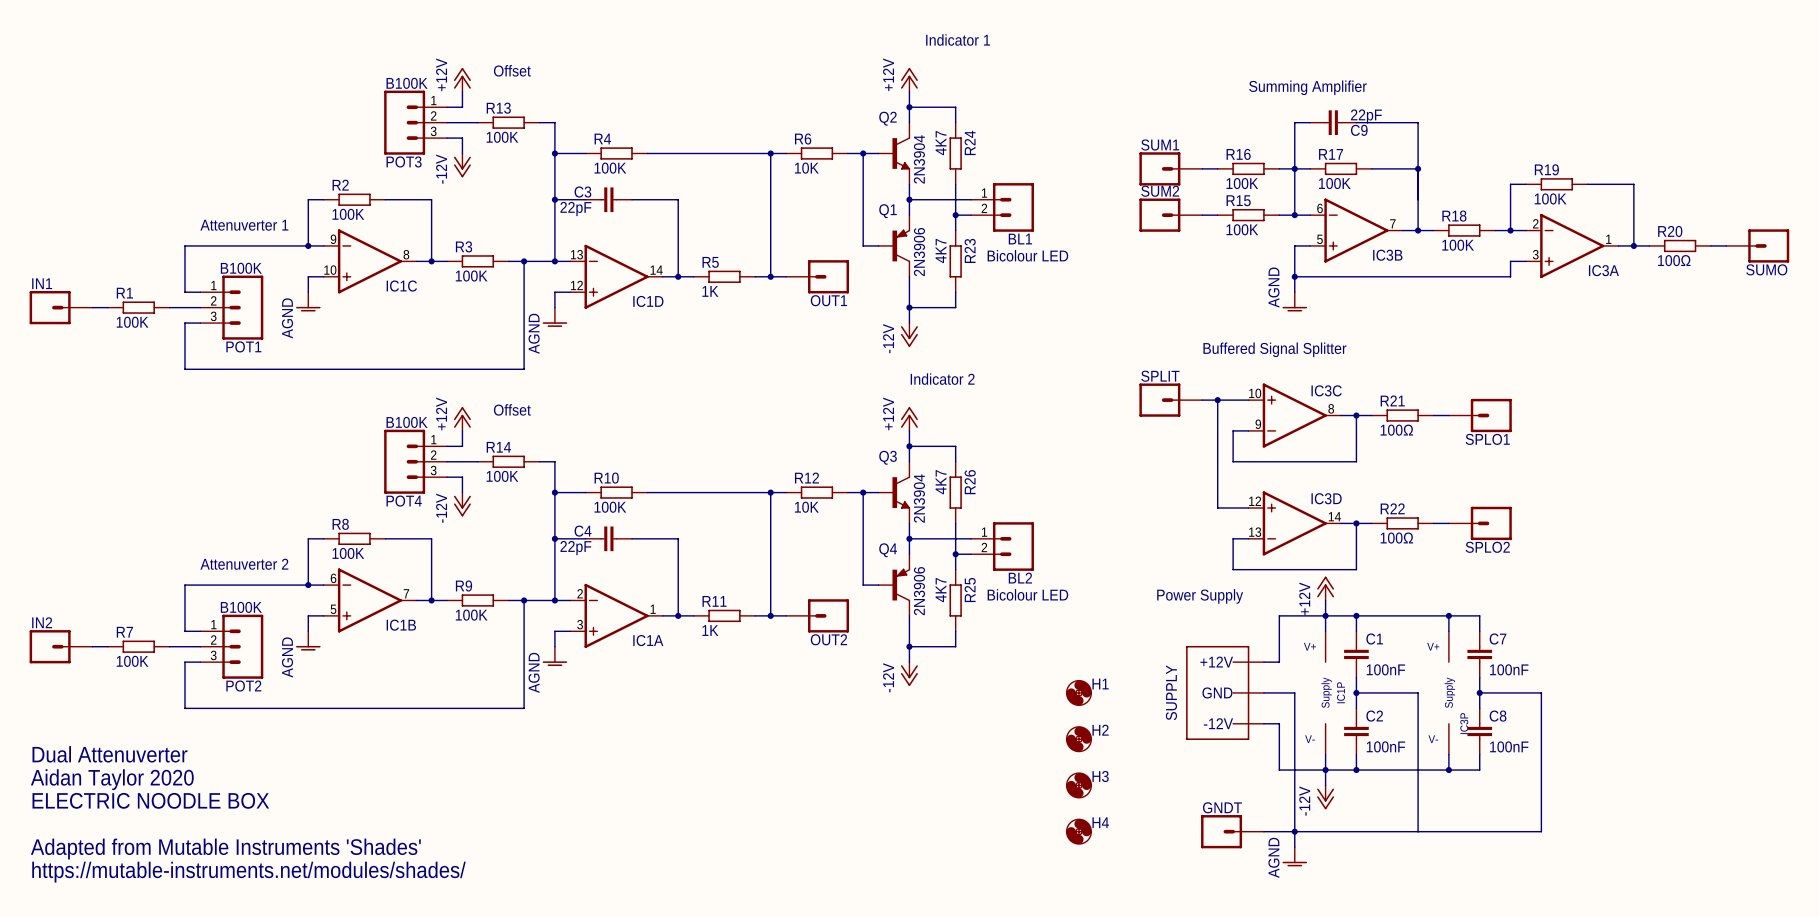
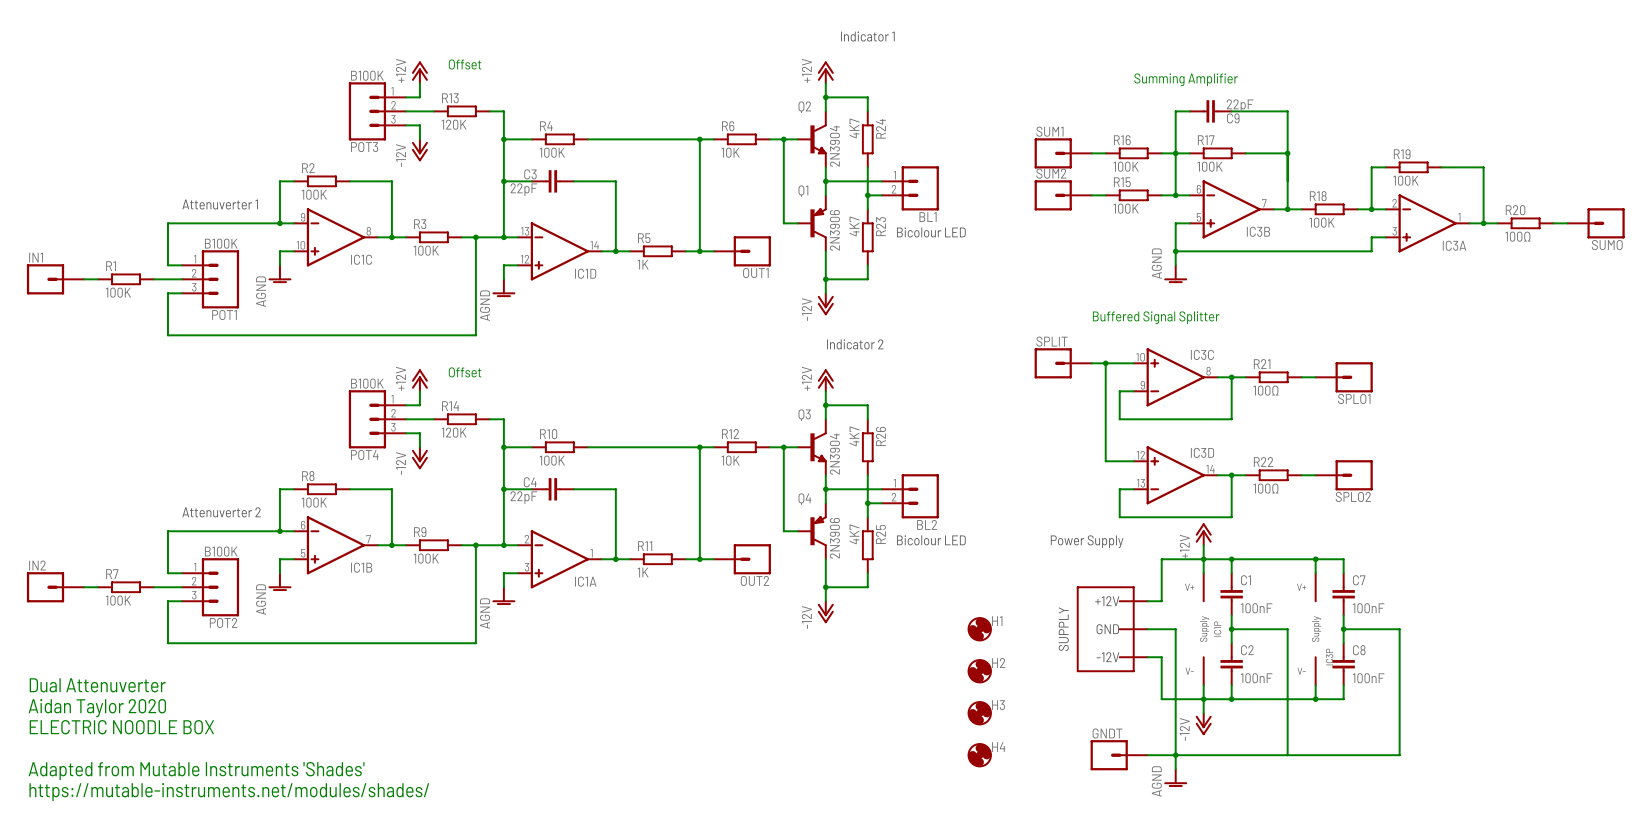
R13 value: 100K (502, 137) -> 120K (454, 124)
R14 value: 100K (502, 476) -> 120K (454, 432)

